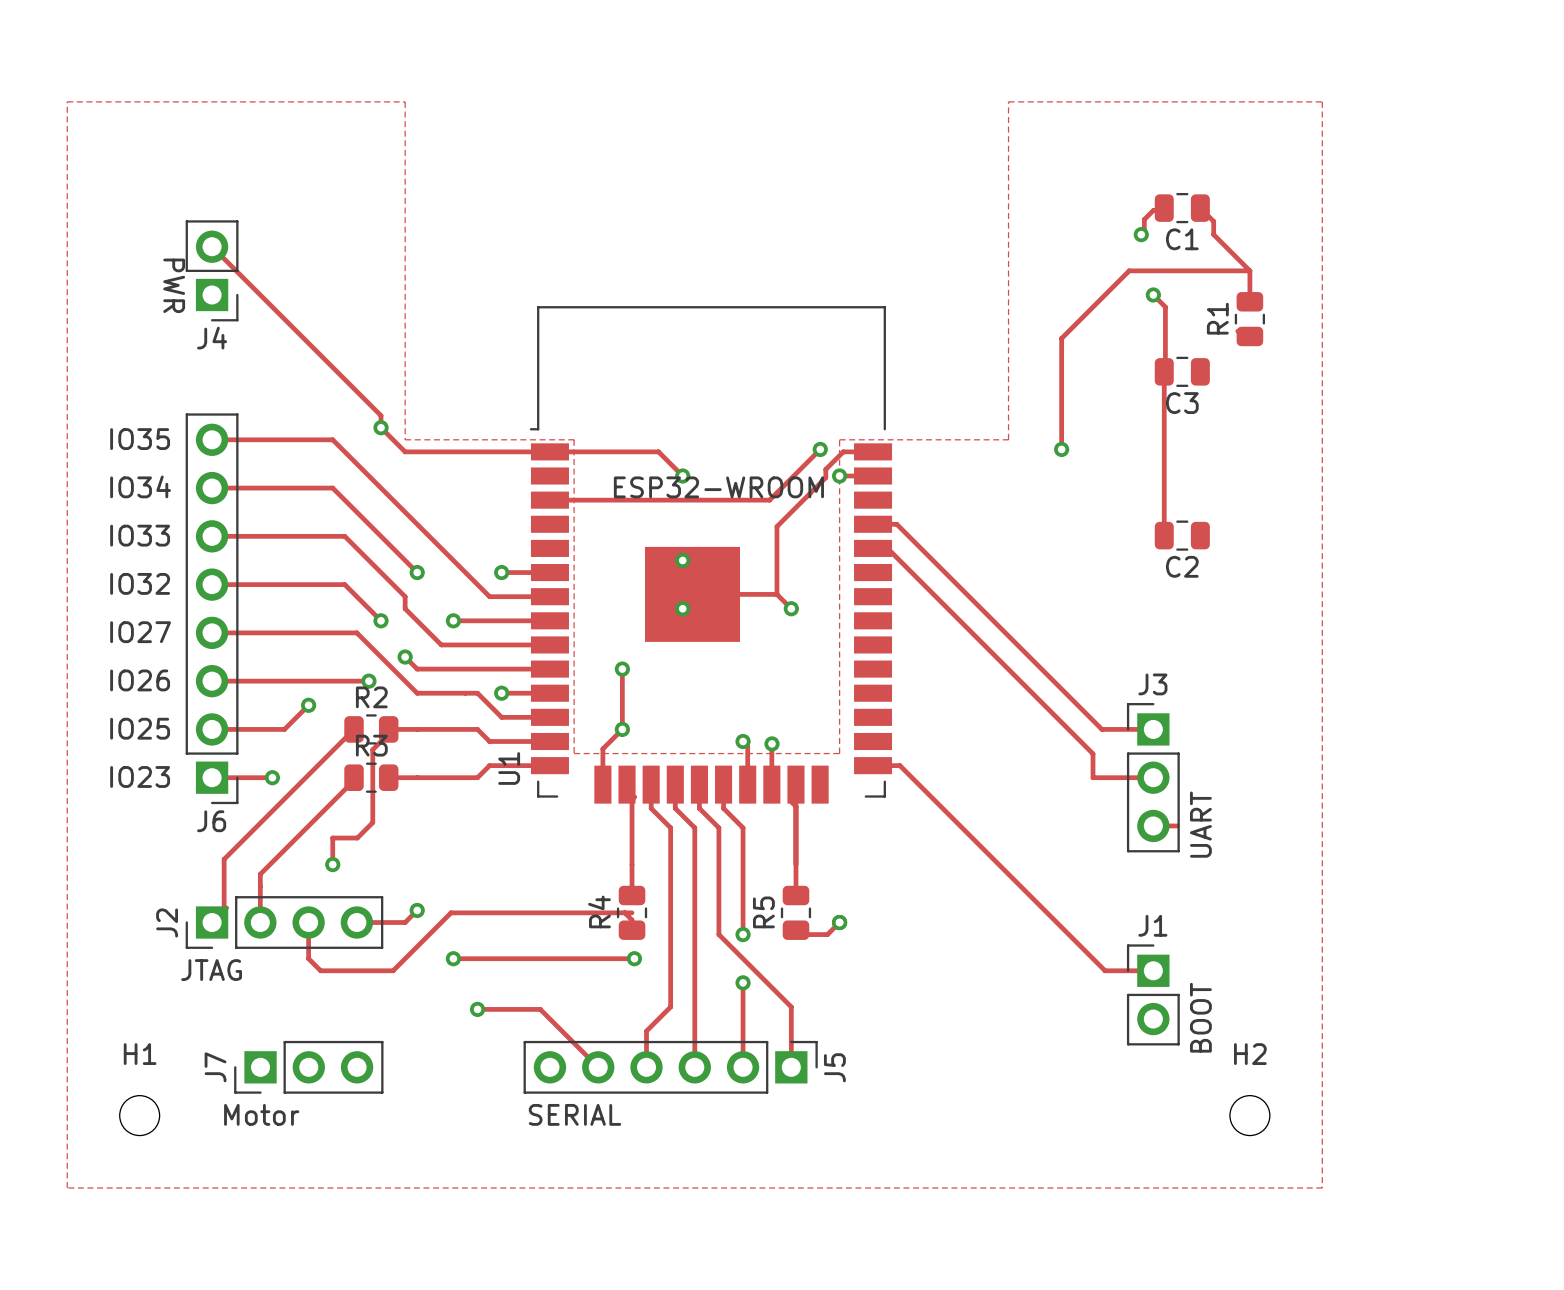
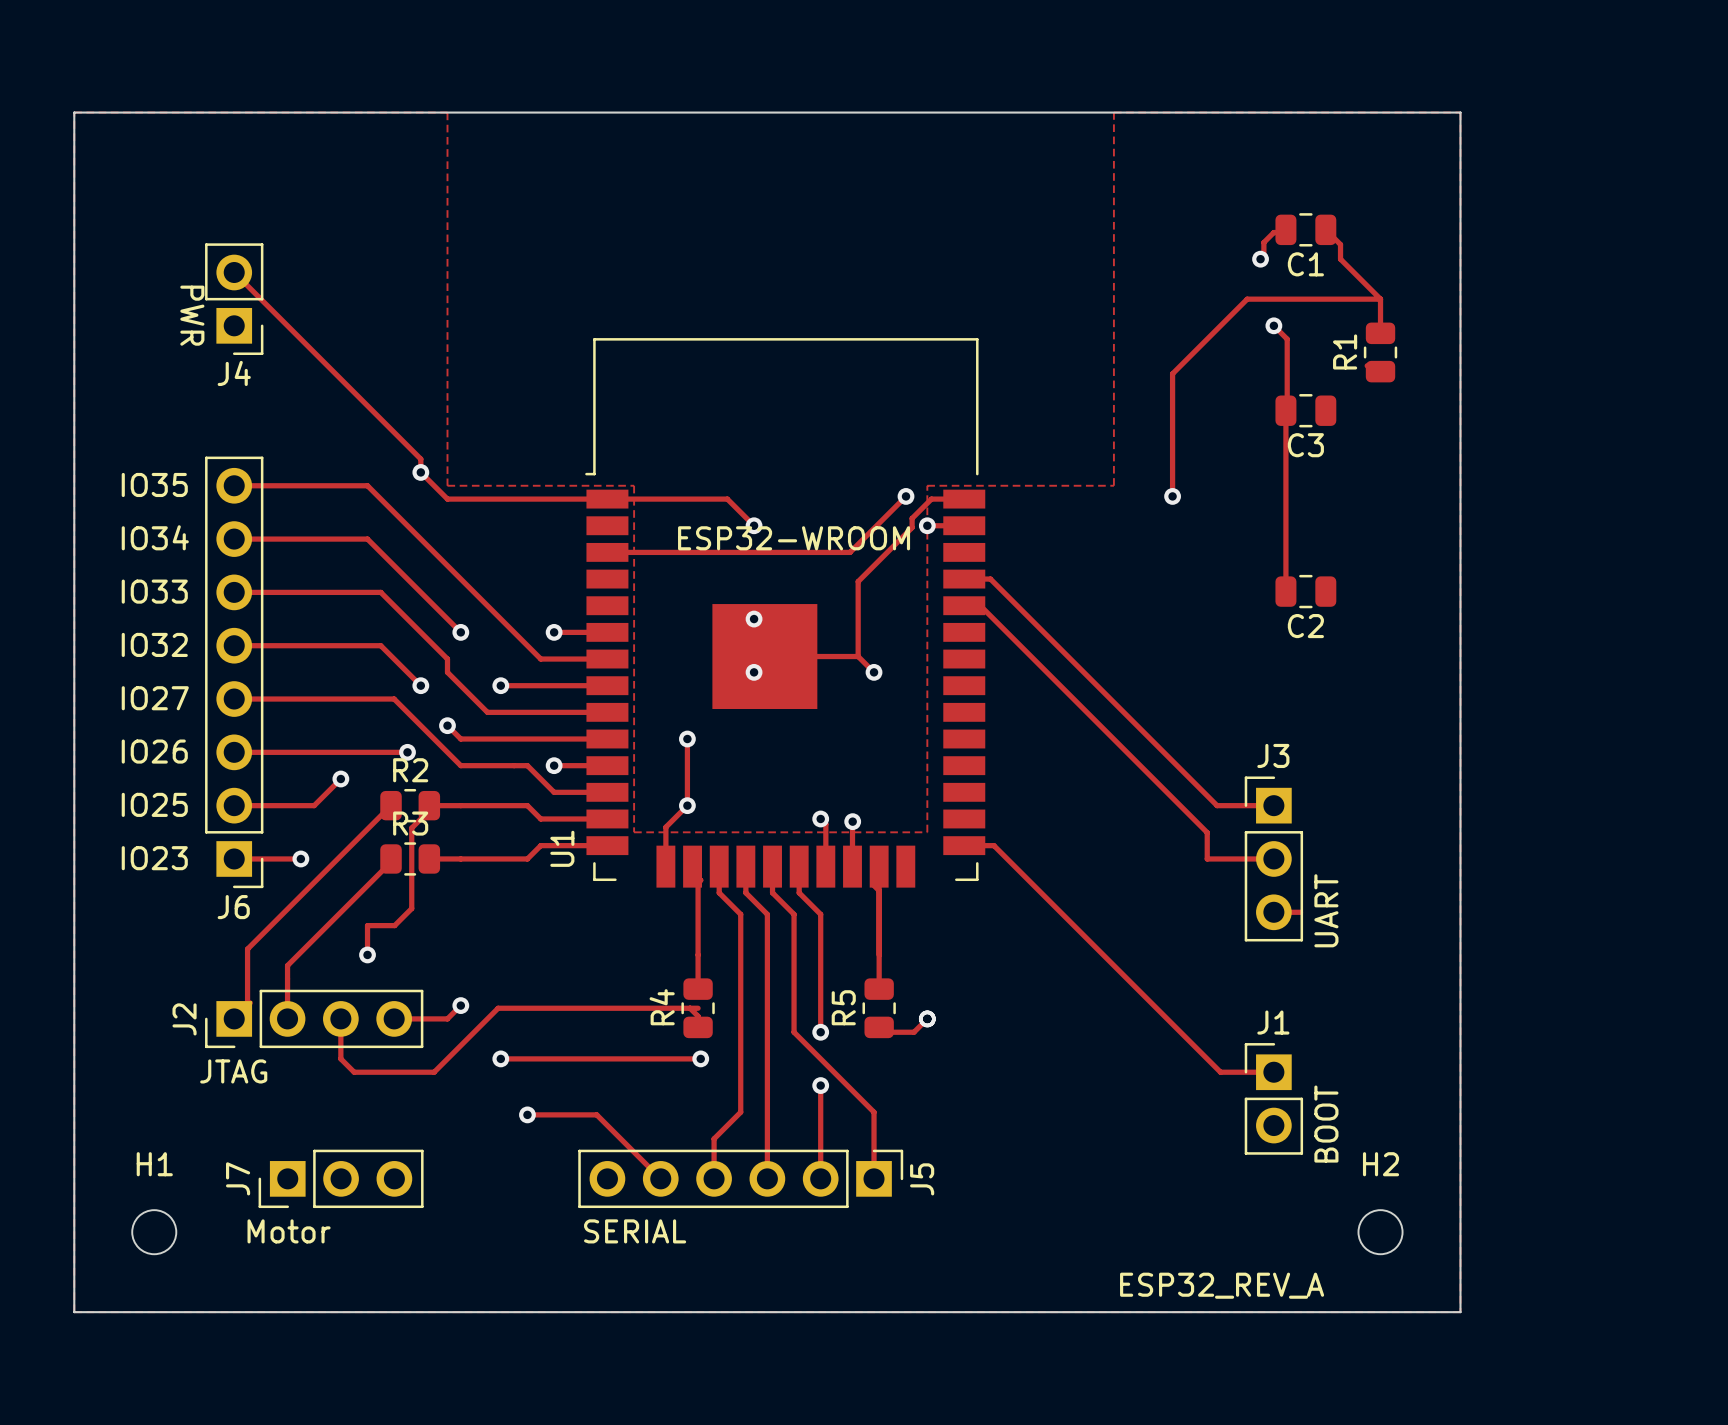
board edge: none -> (74, 112) (1460, 112) (1460, 1312) (74, 1312) (74, 112)
text: none -> ESP32_REV_A (1222, 1285)

